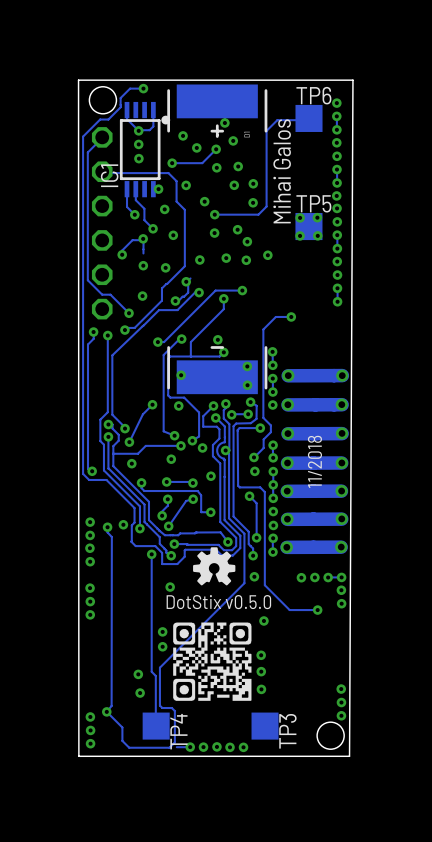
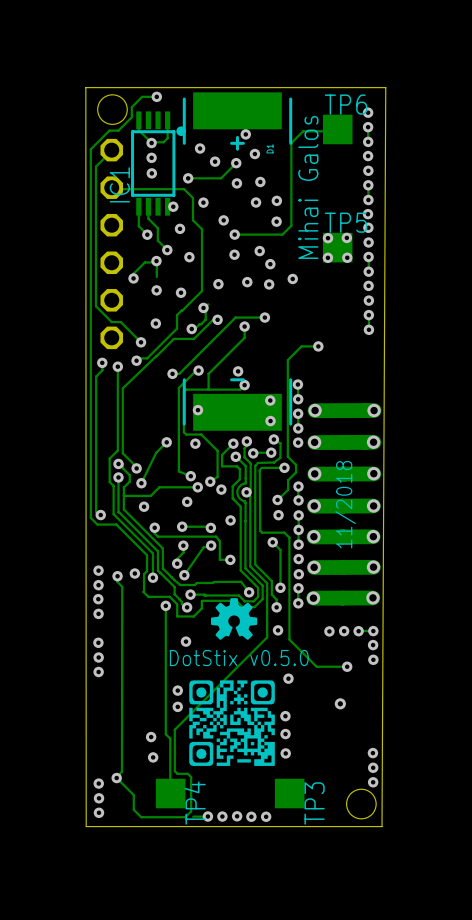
via: none -> (340, 703)

